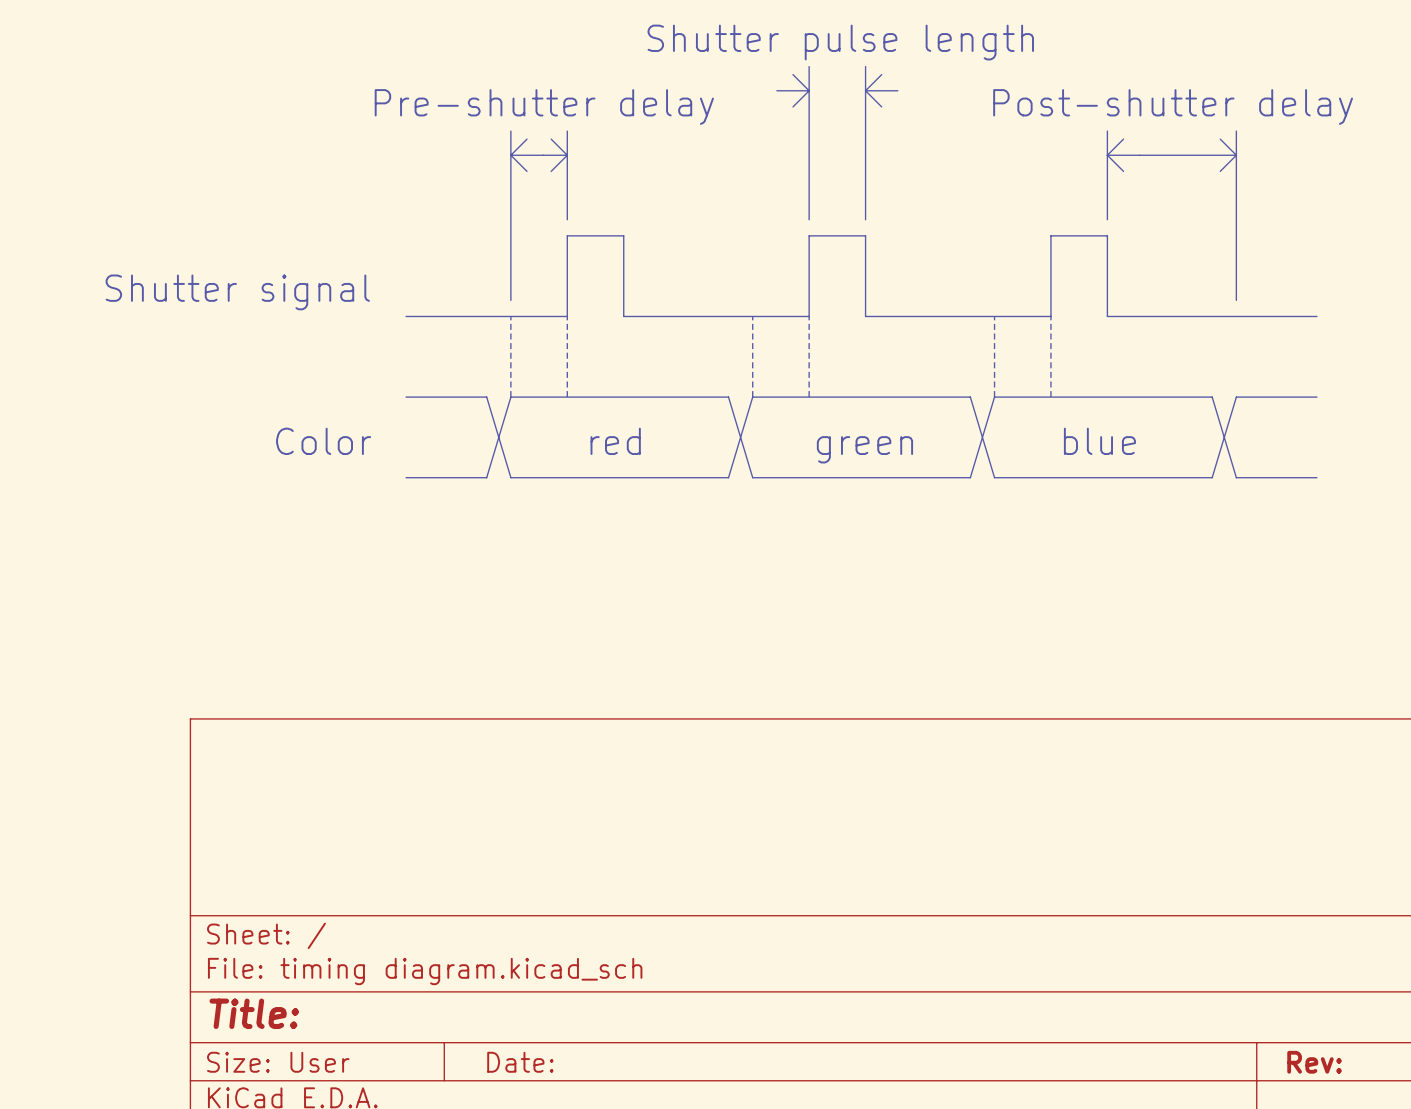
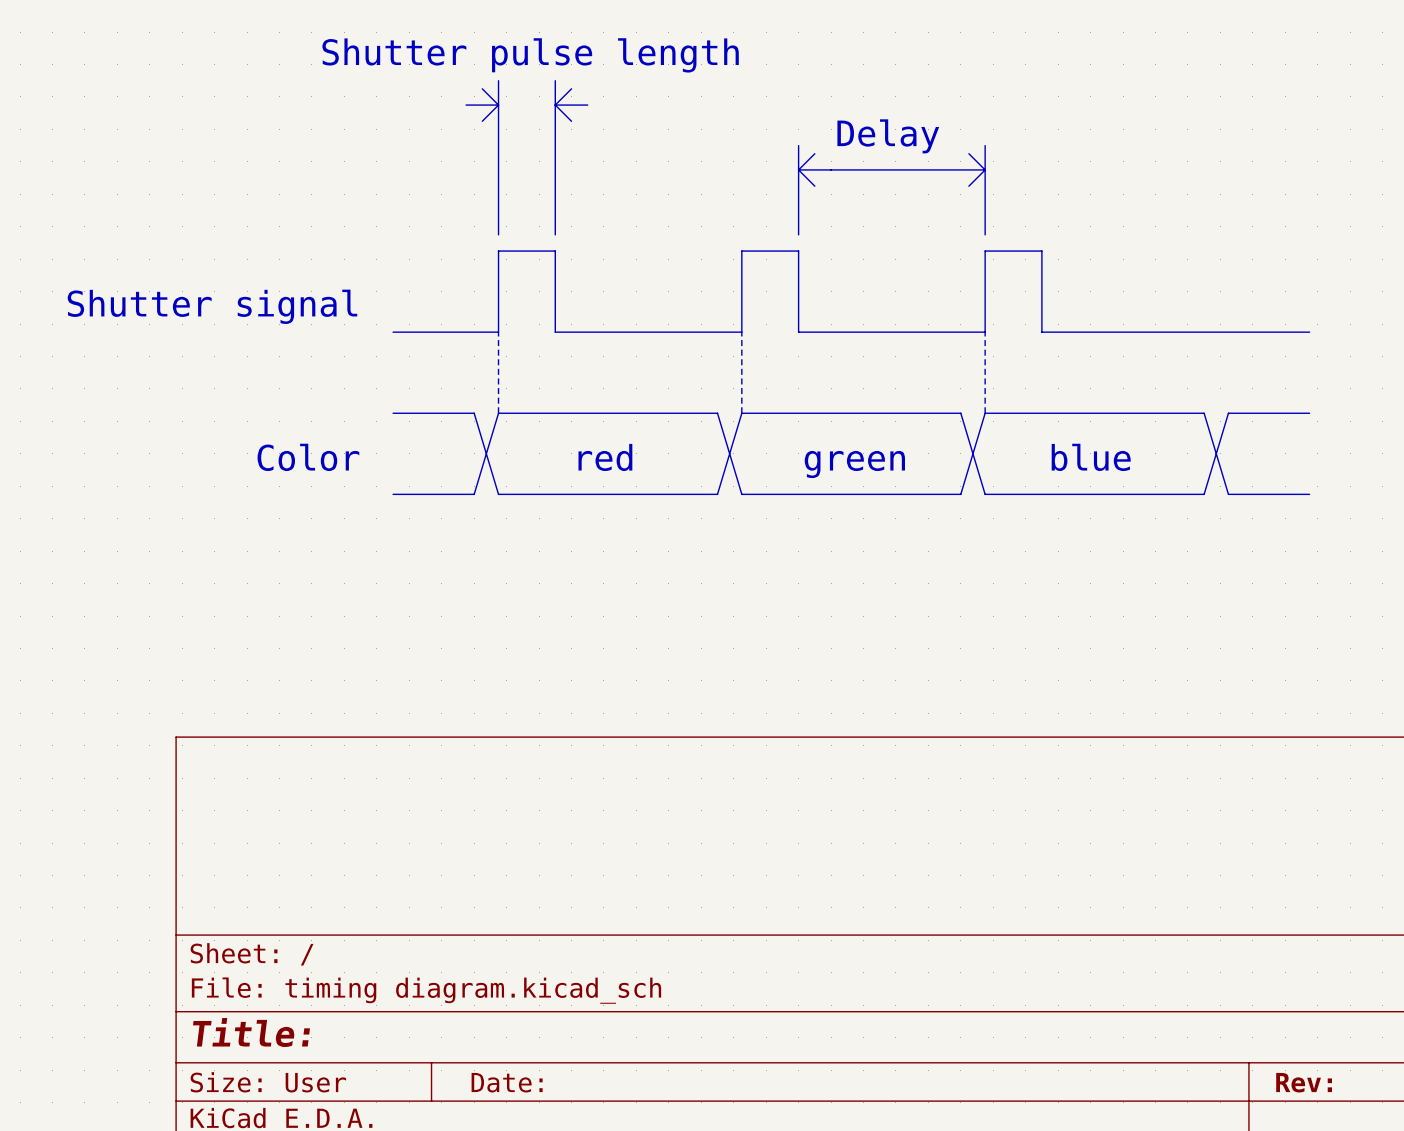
text position: Shutter pulse length (840, 42) -> Shutter pulse length (530, 55)
line: none -> (555, 80) (555, 145)
line: (809, 66) (809, 131) -> (498, 80) (498, 145)
line: (865, 66) (865, 219) -> none
line: (793, 74) (809, 90) -> (482, 88) (498, 105)
line: (881, 74) (865, 90) -> (571, 88) (555, 105)
line: (776, 90) (809, 90) -> (466, 105) (498, 105)
line: (809, 90) (793, 106) -> (498, 105) (482, 121)
line: (865, 90) (897, 90) -> (555, 105) (587, 105)
line: (865, 90) (881, 106) -> (555, 105) (571, 121)
text: Pre-shutter delay (544, 107) -> none
text: Post-shutter delay (1173, 107) -> none
text: none -> Delay (888, 136)
line: (1107, 131) (1107, 219) -> (985, 145) (985, 234)
line: (1236, 131) (1236, 300) -> none
line: (527, 139) (510, 155) -> none
line: (551, 139) (567, 155) -> none
line: (1123, 139) (1107, 155) -> (814, 153) (798, 169)
line: (1220, 139) (1236, 155) -> (968, 153) (985, 169)
line: (510, 155) (527, 171) -> none
line: (510, 155) (567, 155) -> none
line: (567, 155) (551, 171) -> none
line: none -> (798, 169) (985, 169)
line: (1107, 155) (1123, 171) -> (798, 169) (814, 186)
line: (1107, 155) (1236, 155) -> none
line: (1236, 155) (1220, 171) -> (985, 169) (968, 186)
line: (510, 219) (510, 235) -> (555, 251) (498, 251)
line: (567, 235) (623, 235) (623, 316) -> (555, 332) (612, 332)
line: (809, 235) (865, 235) (865, 316) -> (798, 332) (855, 332)
line: (1050, 235) (1107, 235) (1107, 316) -> (1041, 332) (1098, 332)
line: (510, 316) (567, 316) (567, 397) -> (498, 332) (498, 315)
line: (752, 316) (809, 316) (809, 397) -> (741, 332) (741, 251) (798, 251)
line: (994, 316) (1050, 316) (1050, 397) -> (985, 332) (985, 251) (1041, 251)

